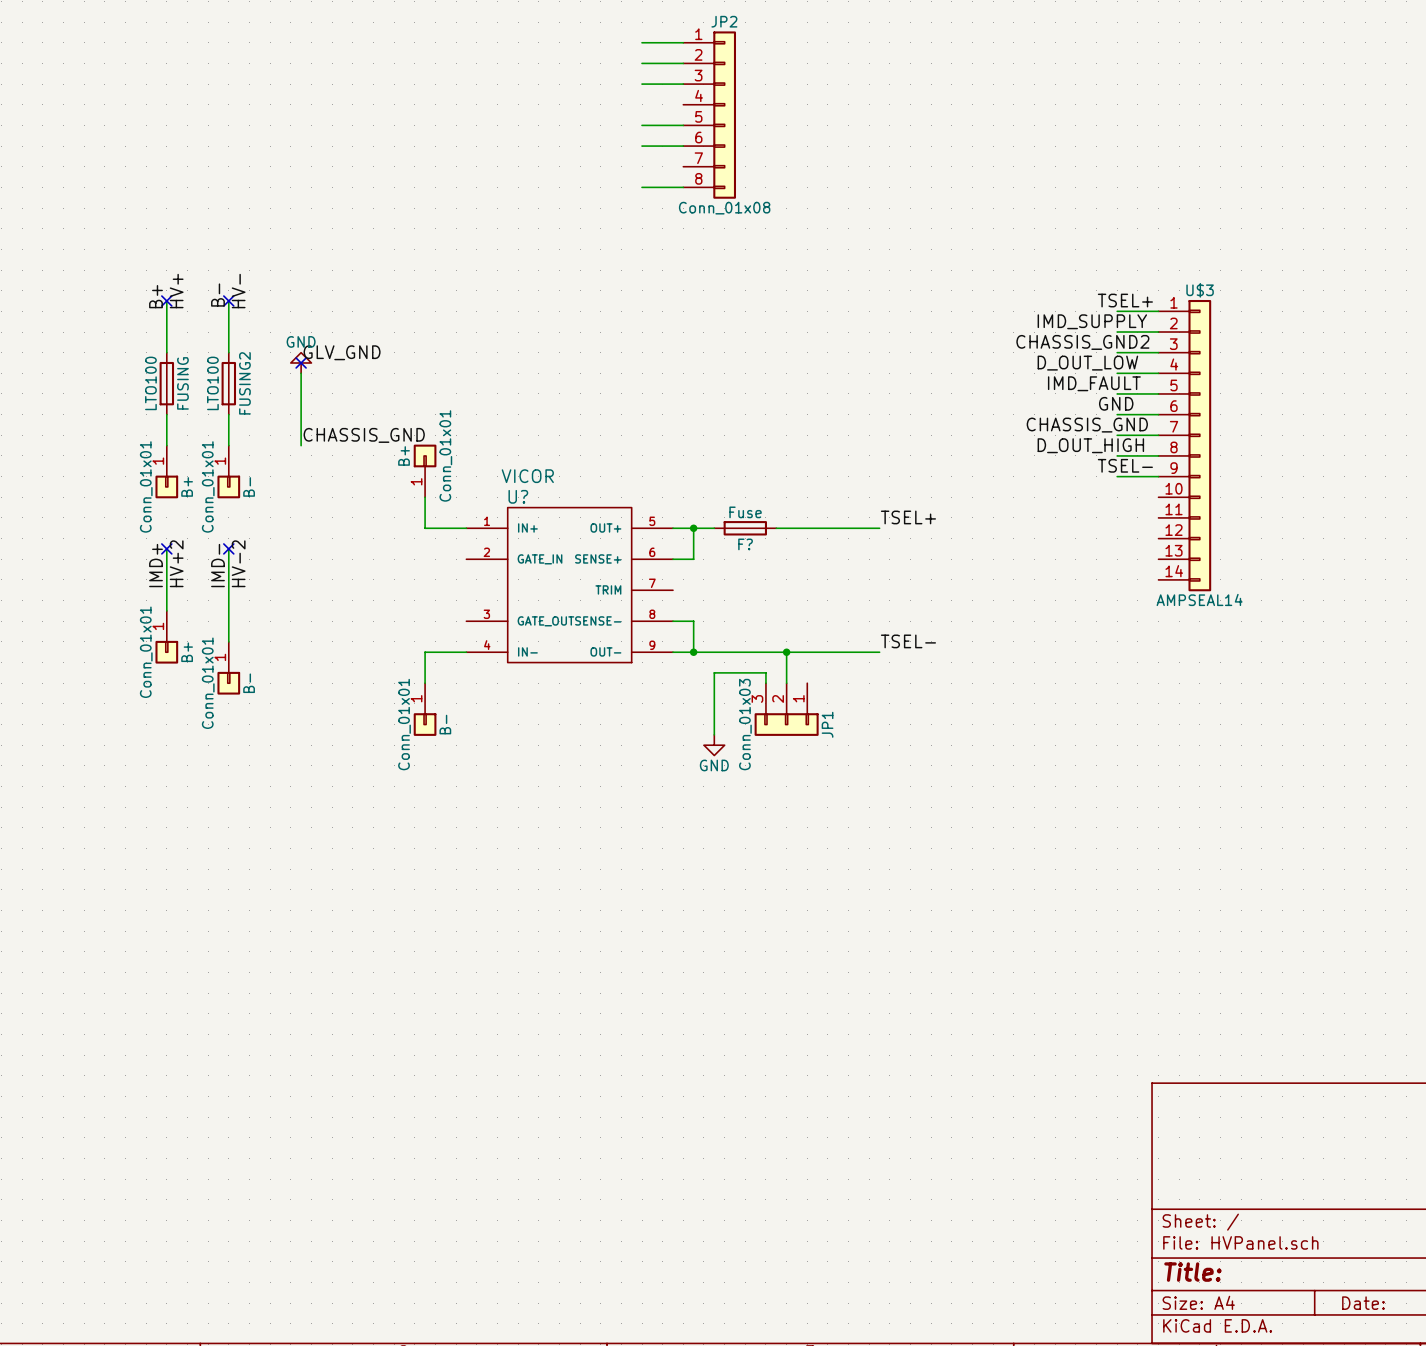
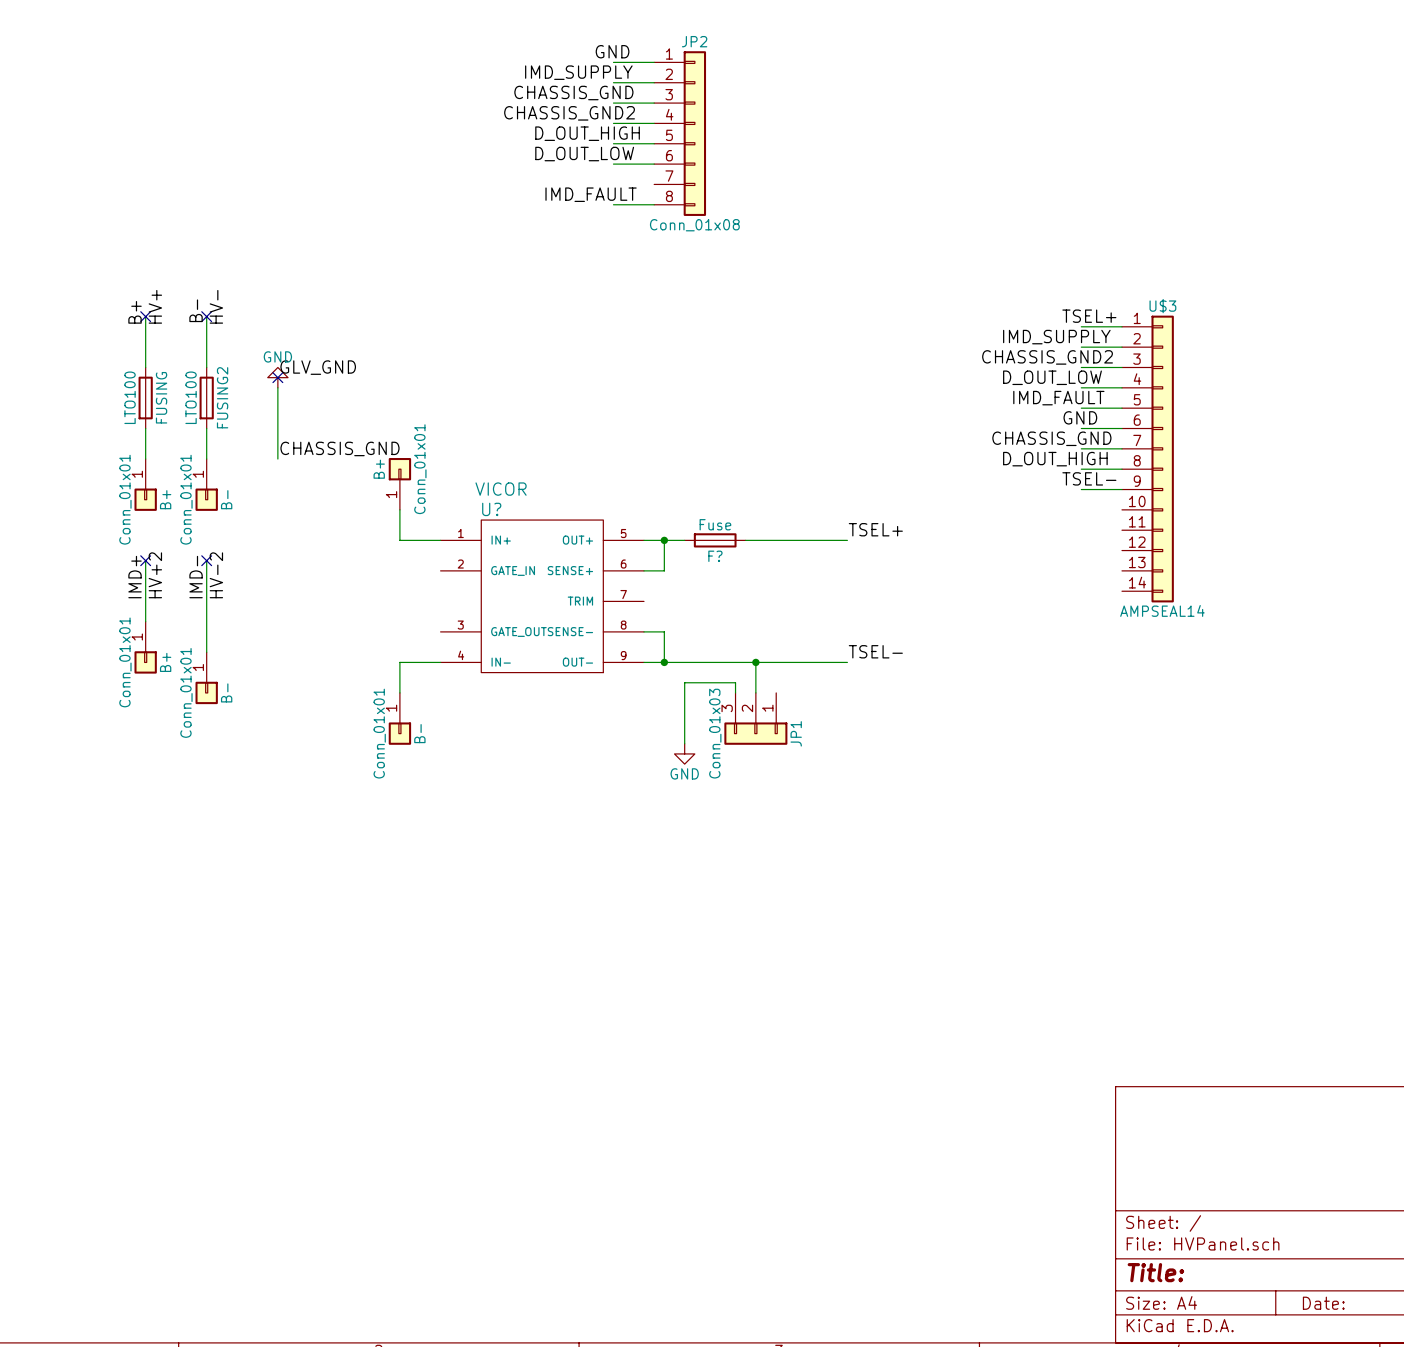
label: none -> GND (612, 51)
label: none -> IMD_SUPPLY (578, 72)
label: none -> CHASSIS_GND (573, 93)
label: none -> CHASSIS_GND2 (569, 113)
wire: none -> (613, 123) (654, 123)
label: none -> D_OUT_HIGH (587, 133)
label: none -> D_OUT_LOW (584, 154)
label: none -> IMD_FAULT (591, 194)

